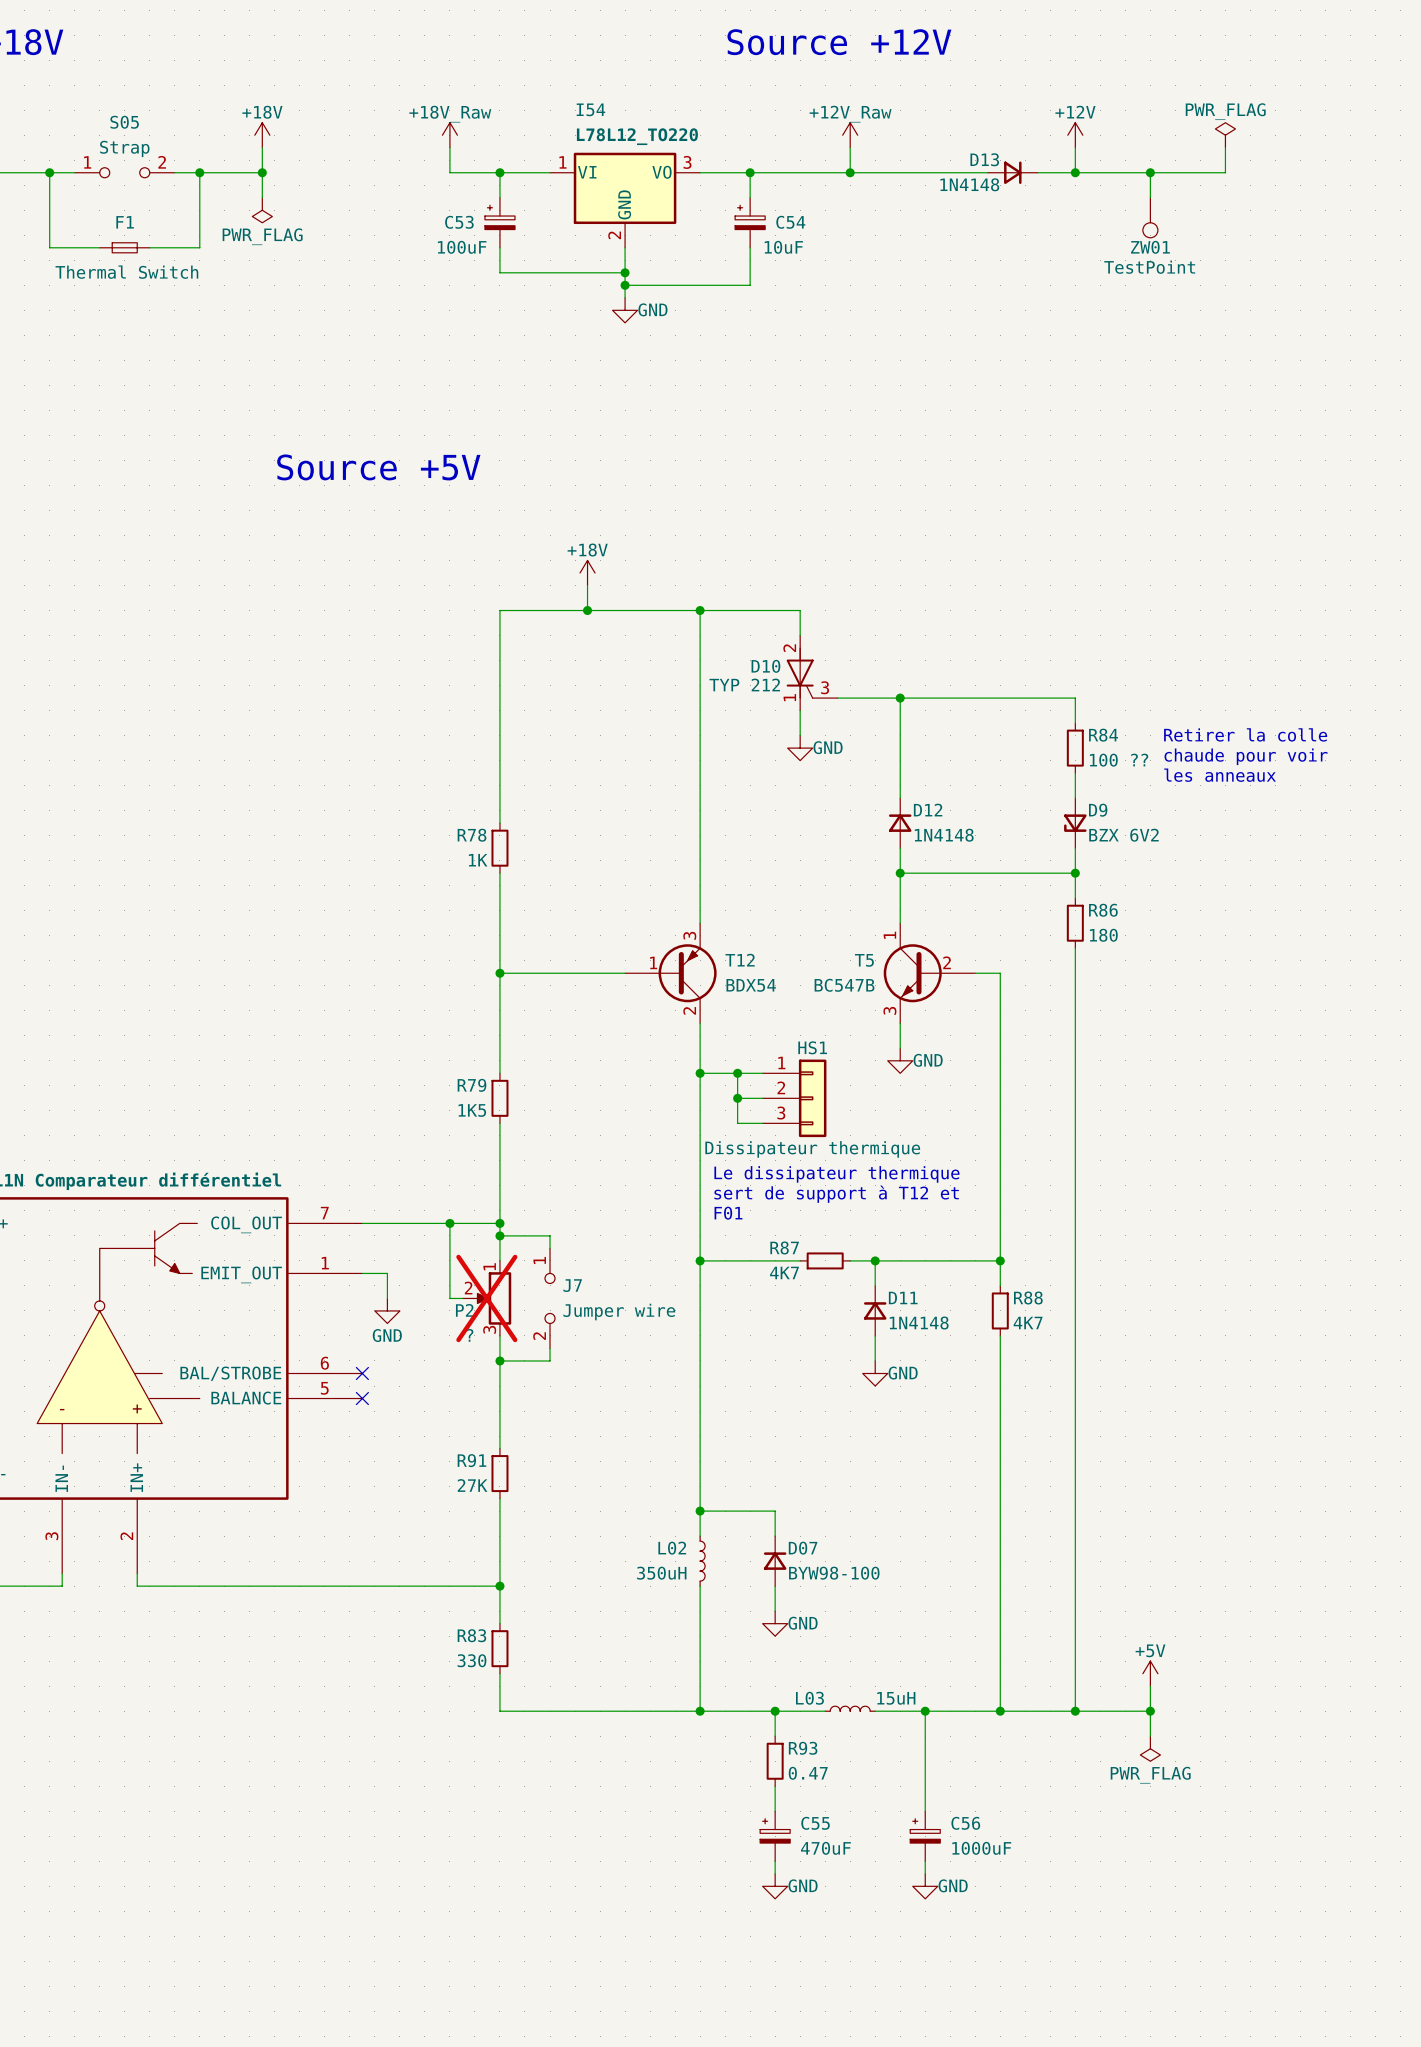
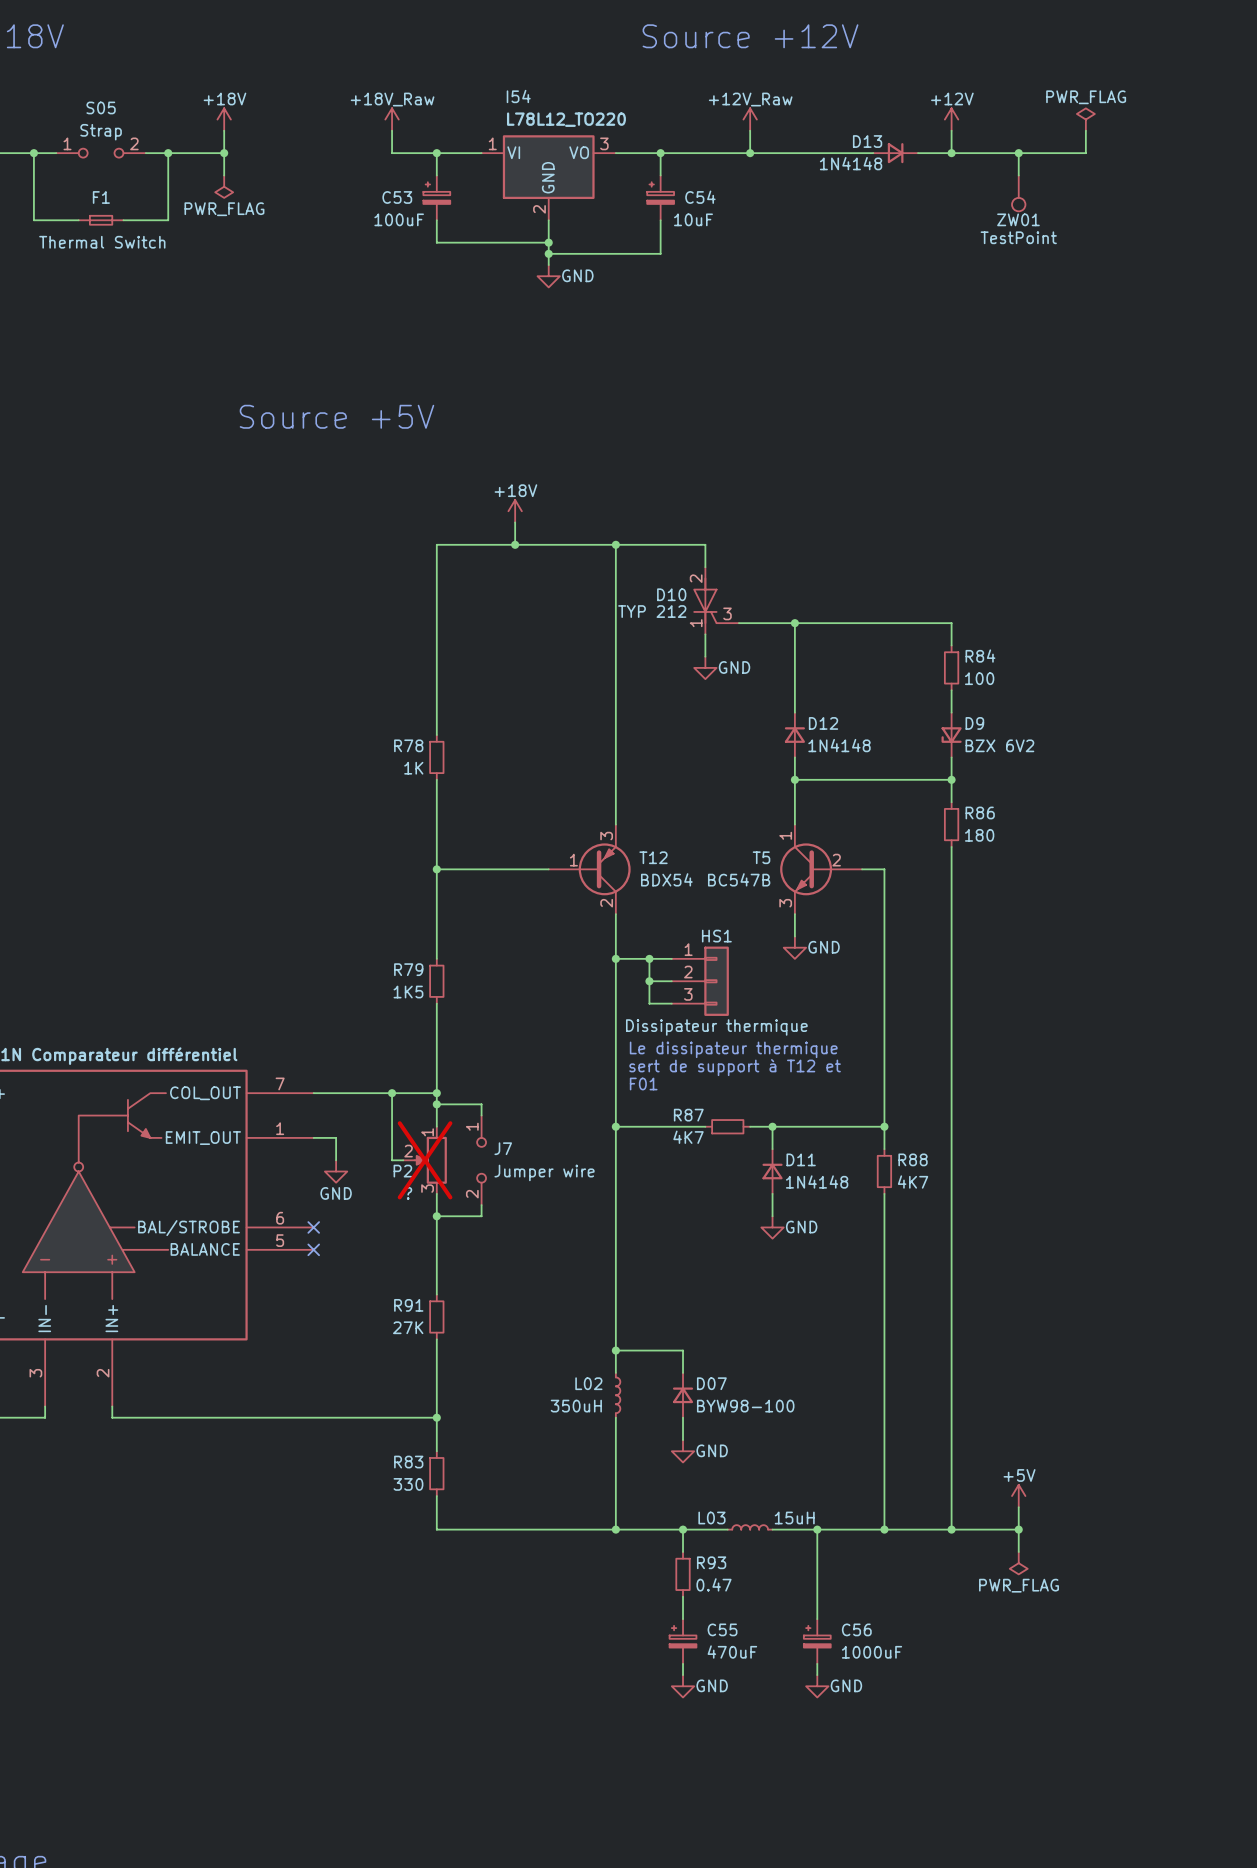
text: Retirer la colle (1245, 734) -> none
text: chaude pour voir (1246, 756) -> none
R84 value: 100 ?? (1119, 760) -> 100 (979, 678)
text: les anneaux (1220, 775) -> none

